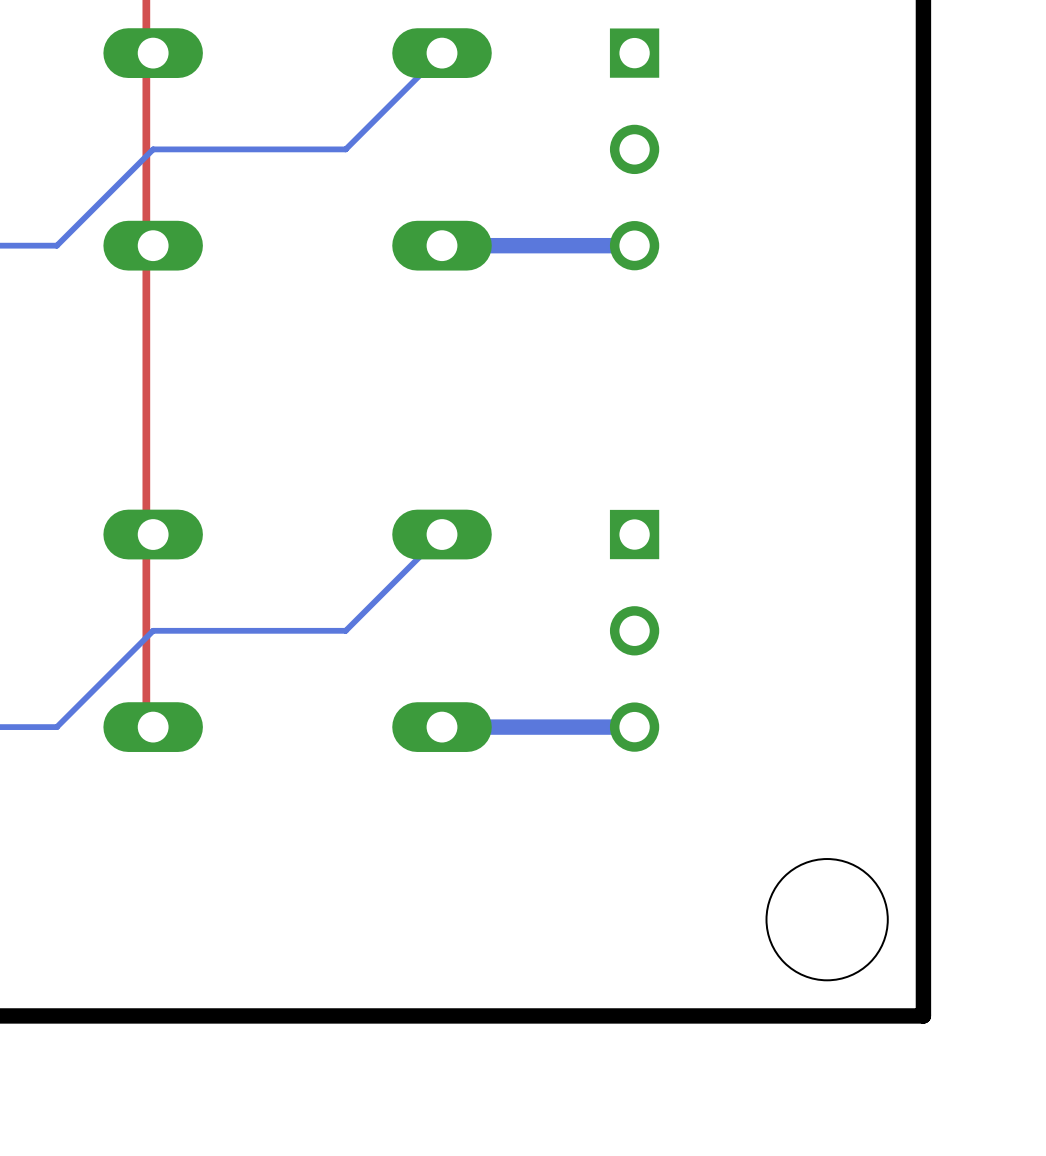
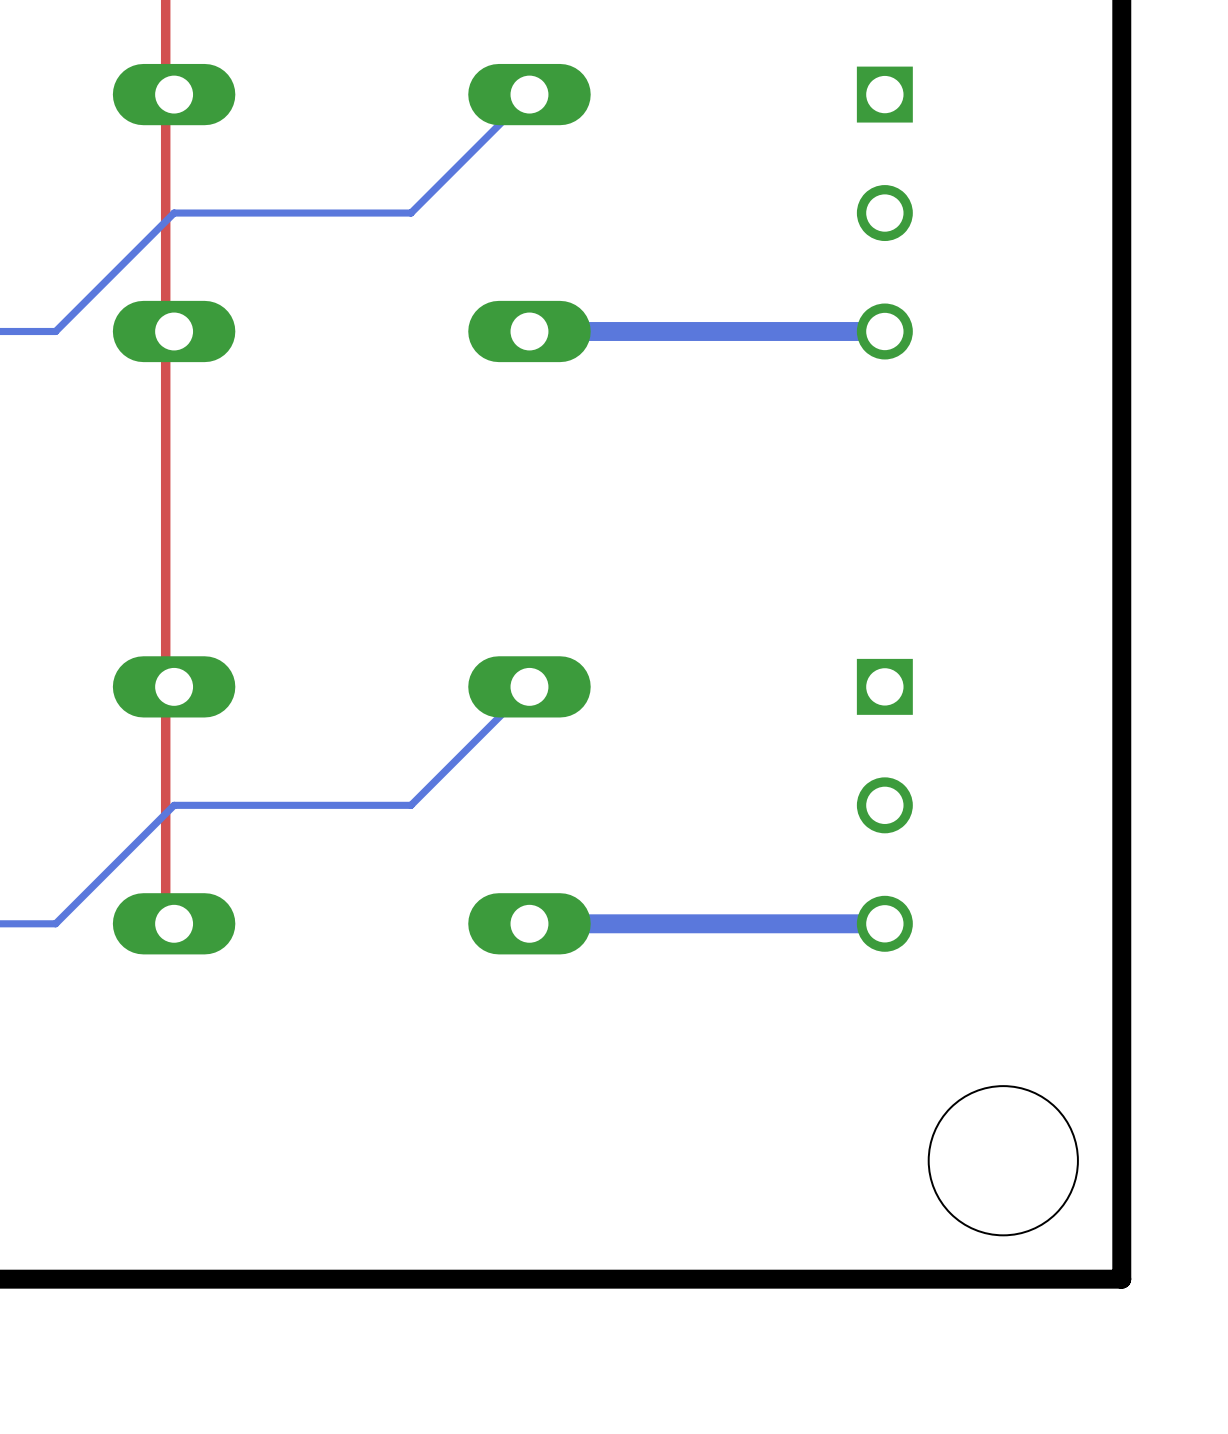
part: (634, 149) -> none
part: none -> (884, 213)
bottom track: none -> (884, 331) (766, 331)
part: (634, 630) -> none
part: none -> (884, 805)
bottom track: none -> (884, 923) (766, 923)

